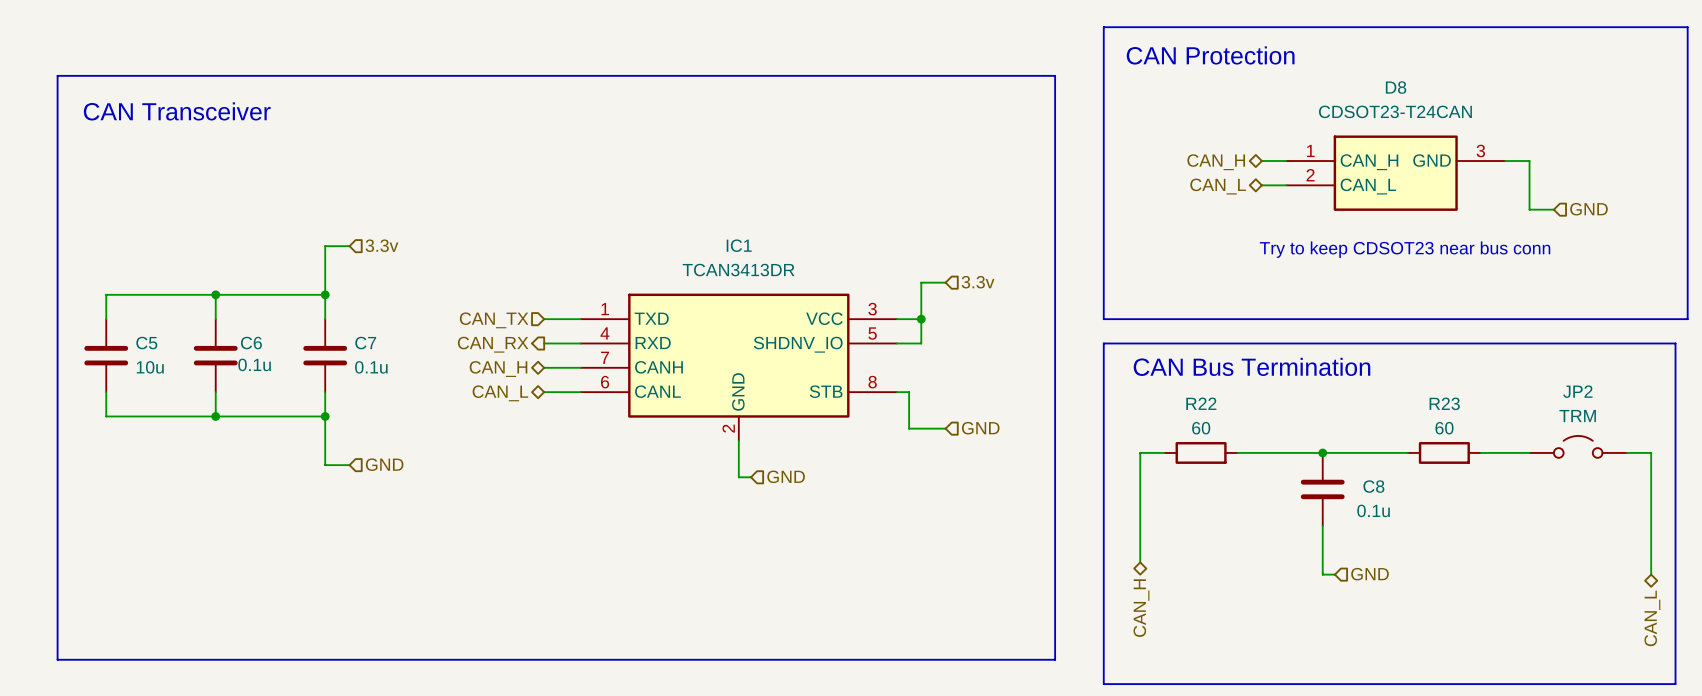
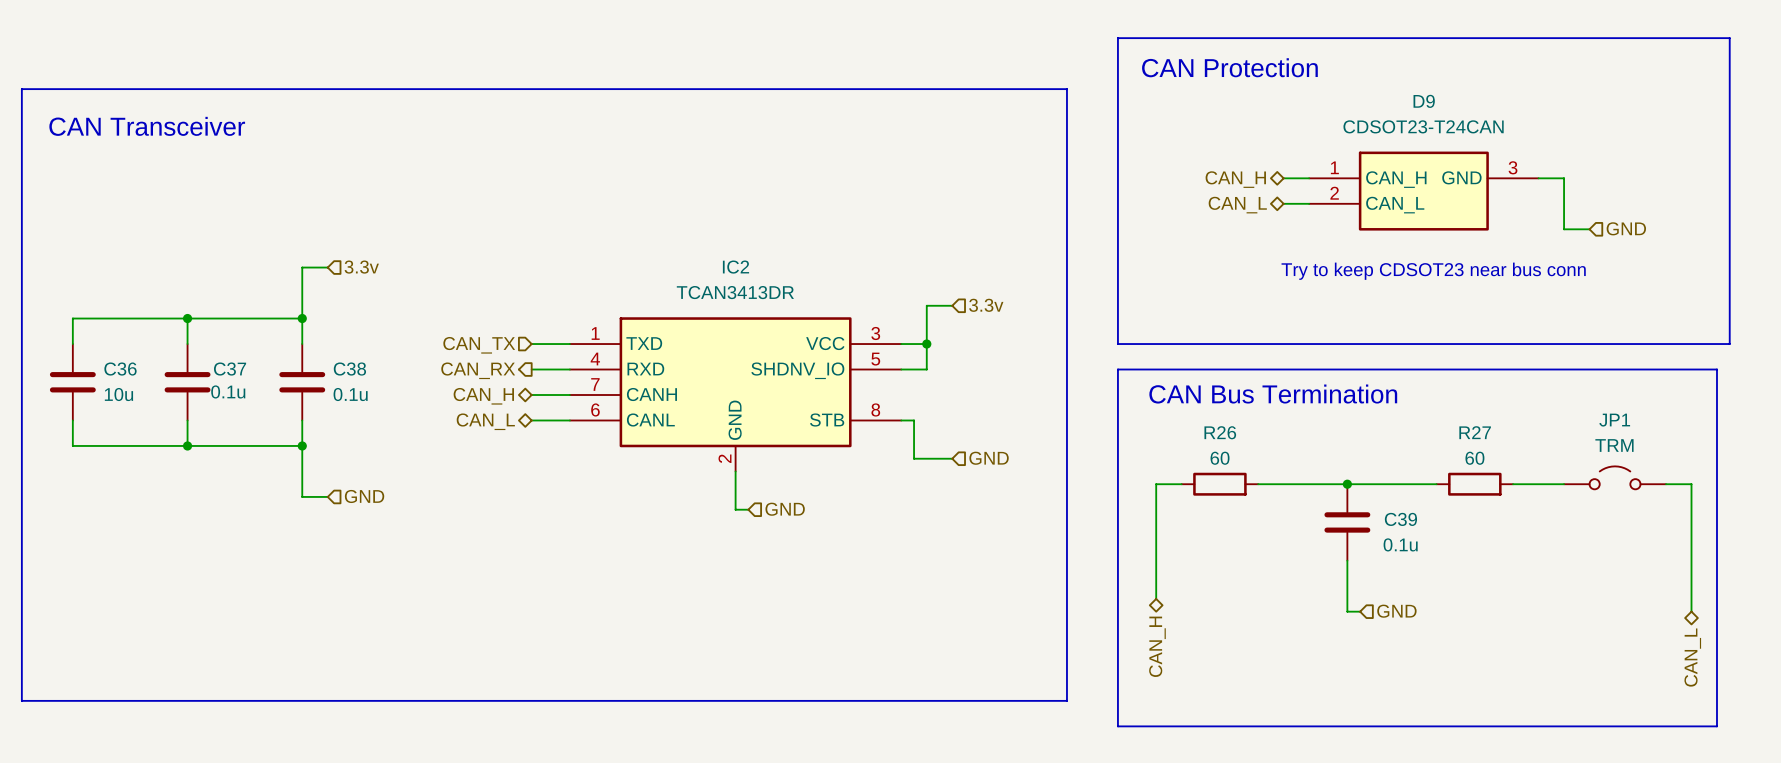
D8 name: D8 (1396, 87) -> D9 (1424, 101)
IC1 name: IC1 (739, 245) -> IC2 (735, 267)
C5 name: C5 (146, 343) -> C36 (120, 369)
C6 name: C6 (251, 343) -> C37 (230, 369)
C7 name: C7 (365, 343) -> C38 (349, 369)
JP2 name: JP2 (1577, 391) -> JP1 (1614, 420)
R22 name: R22 (1201, 403) -> R26 (1220, 432)
R23 name: R23 (1444, 403) -> R27 (1475, 432)
C8 name: C8 (1373, 486) -> C39 (1400, 519)

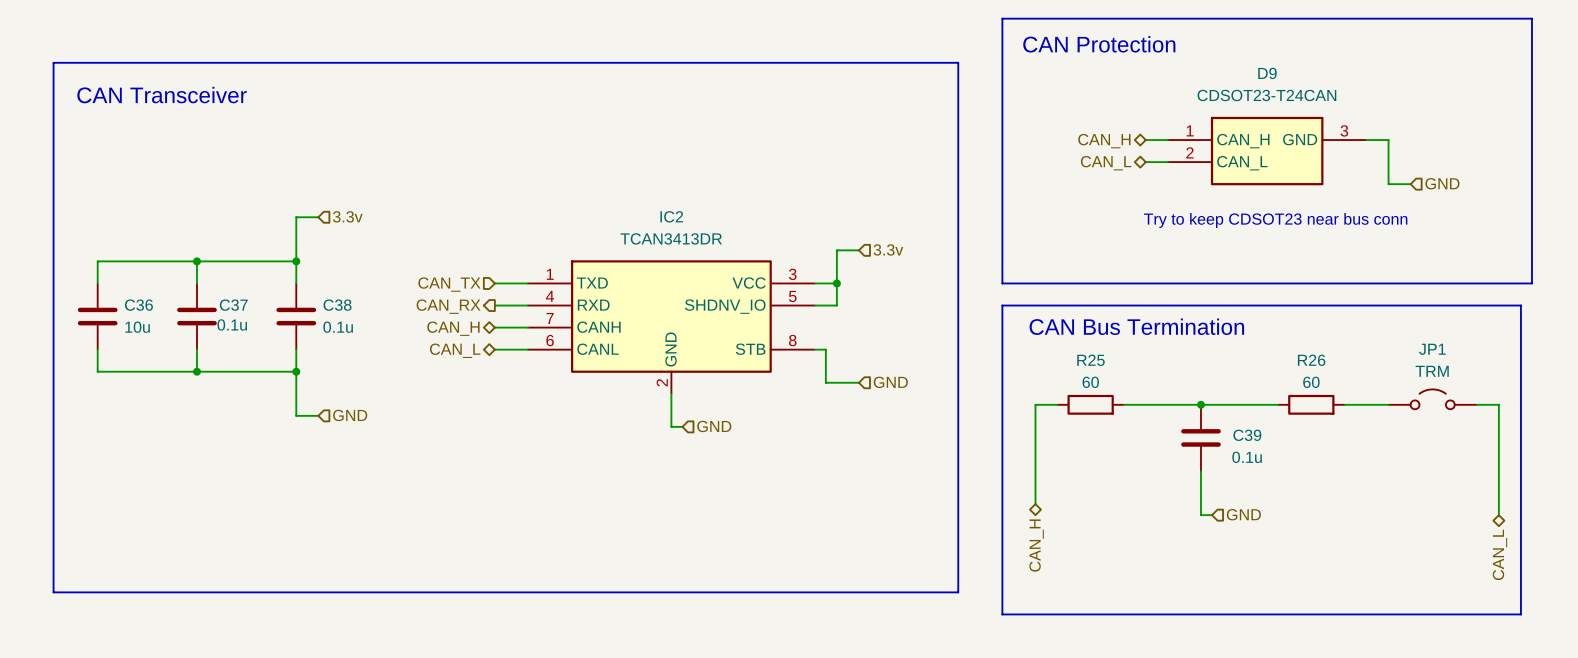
R26 name: R26 (1220, 432) -> R25 (1090, 360)
R27 name: R27 (1475, 432) -> R26 (1311, 360)

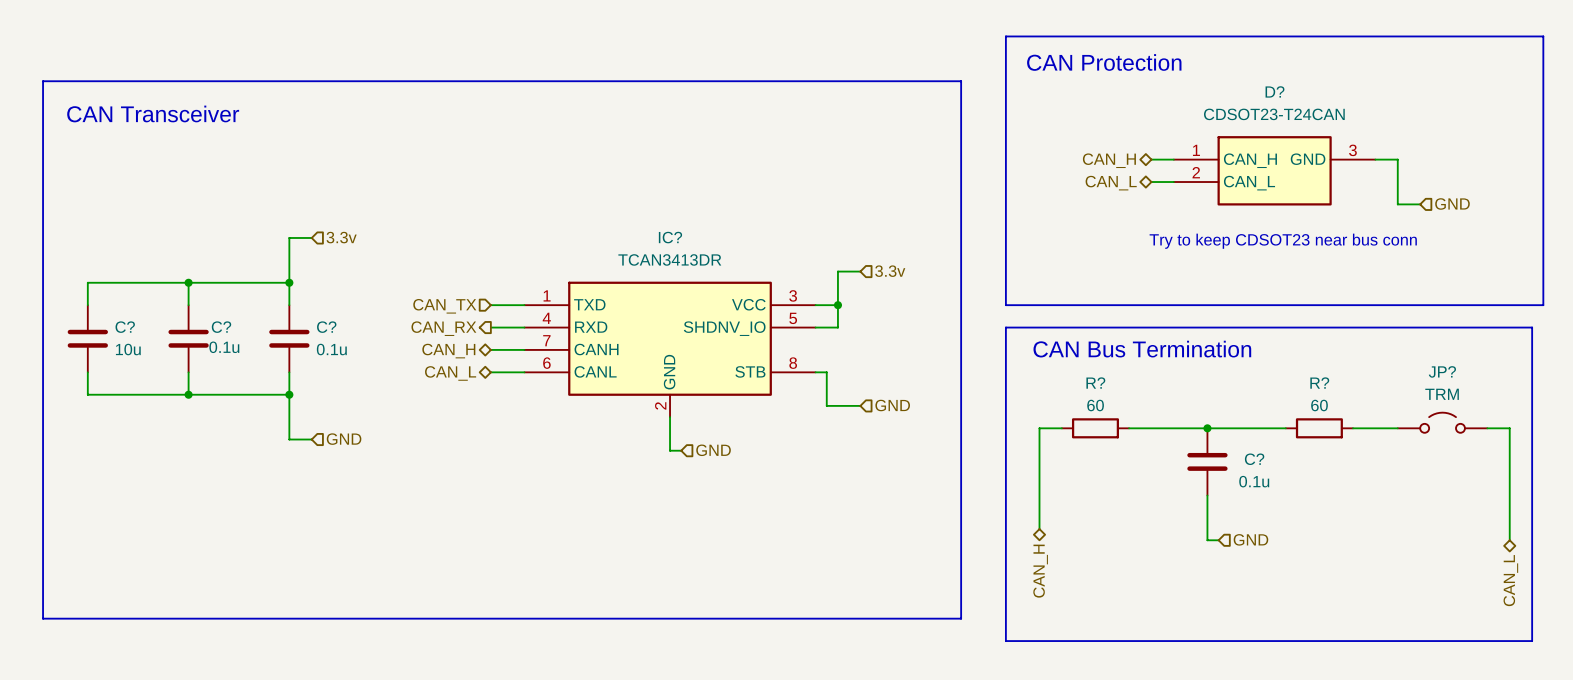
D9 name: D9 (1267, 73) -> D? (1274, 91)
IC2 name: IC2 (671, 216) -> IC? (670, 237)
C36 name: C36 (138, 305) -> C? (125, 327)
C37 name: C37 (233, 305) -> C? (221, 327)
C38 name: C38 (337, 305) -> C? (326, 327)
JP1 name: JP1 (1432, 349) -> JP? (1442, 371)
R25 name: R25 (1090, 360) -> R? (1095, 383)
R26 name: R26 (1311, 360) -> R? (1319, 383)
C39 name: C39 (1247, 435) -> C? (1254, 459)

